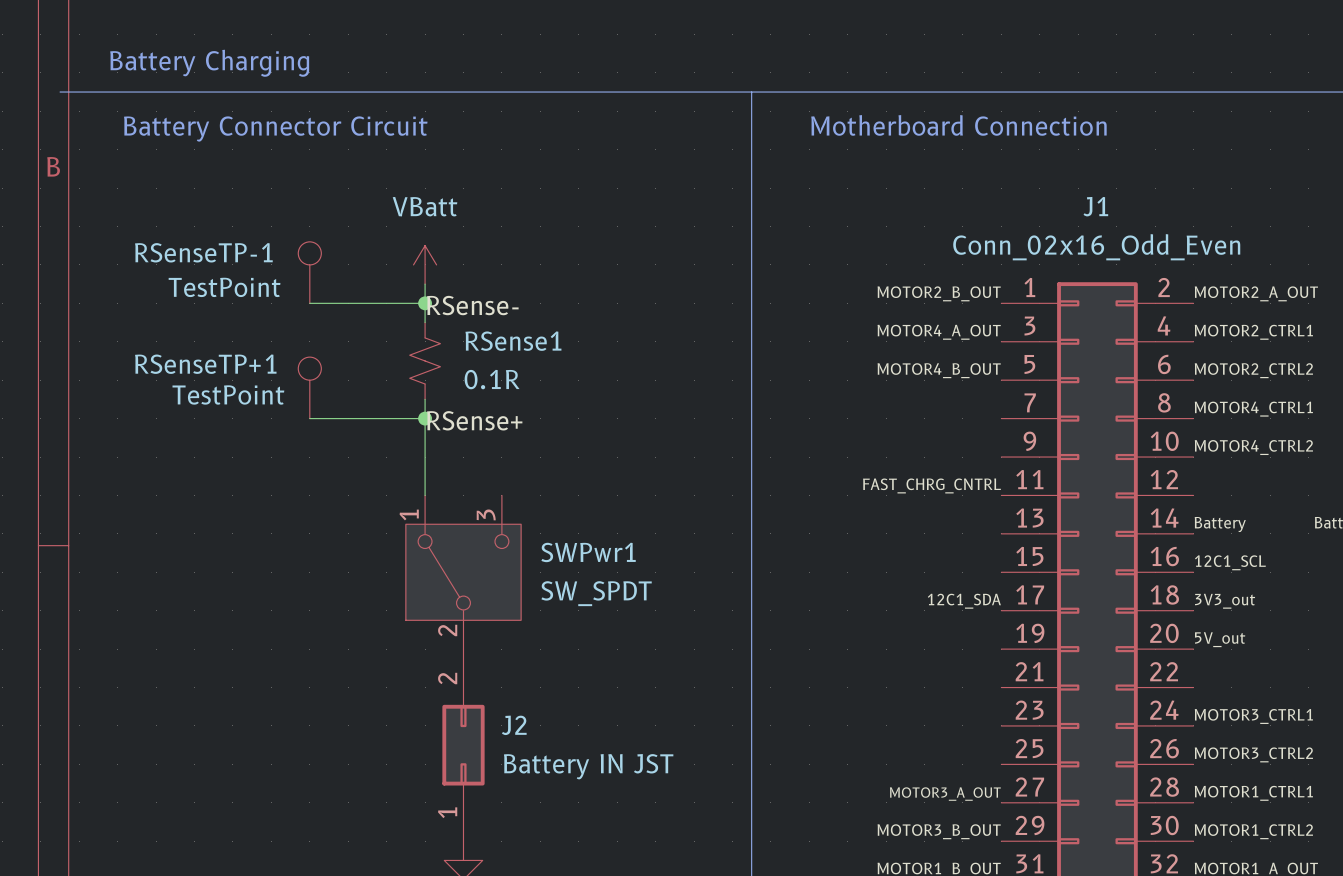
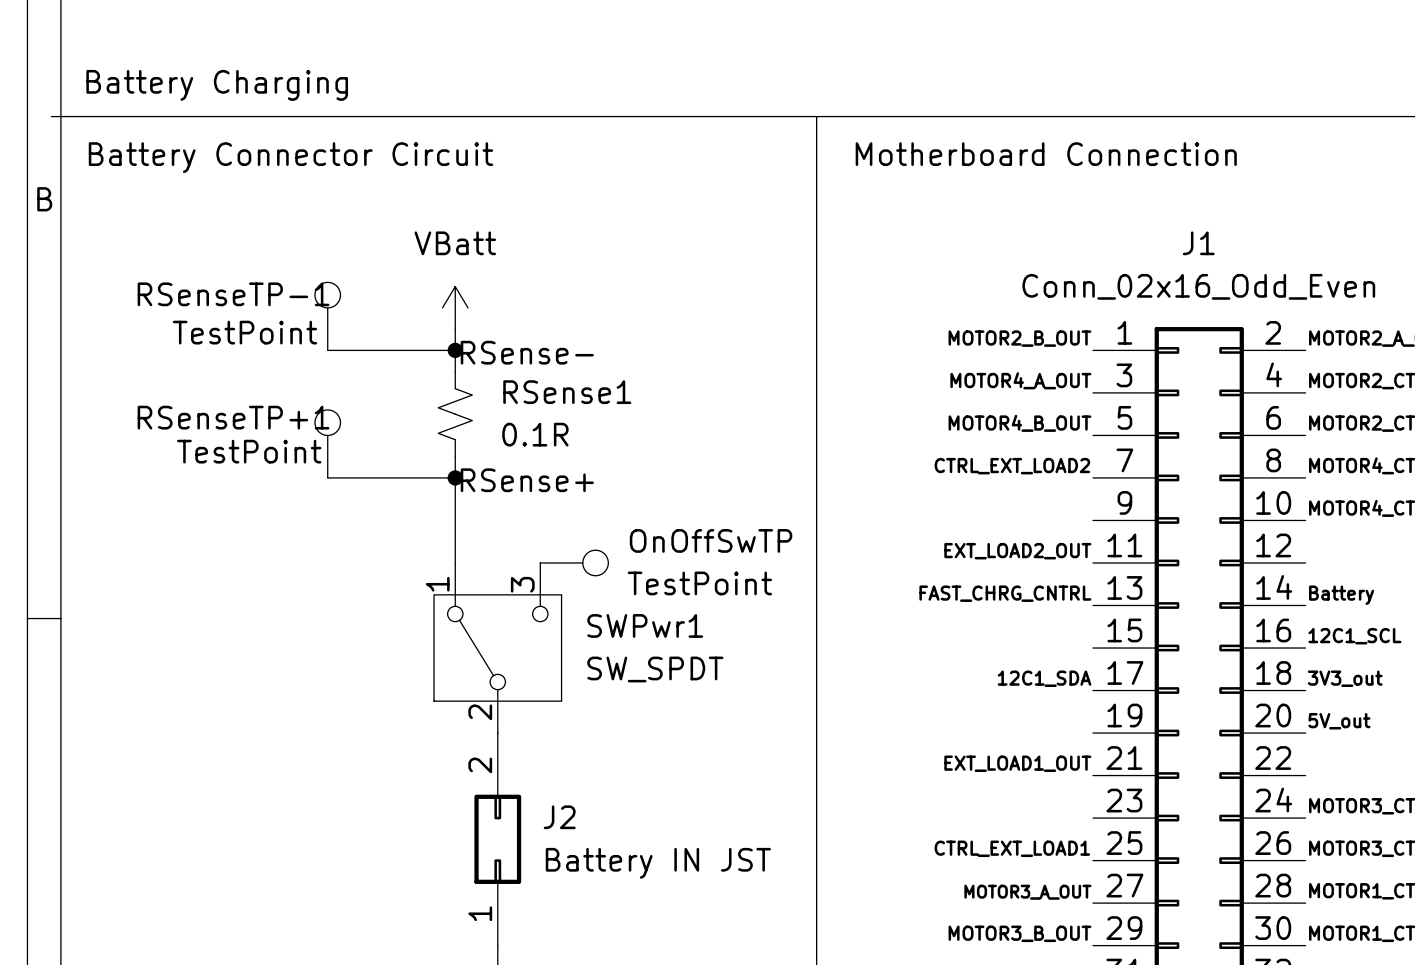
label: none -> CTRL_EXT_LOAD2 (1012, 466)
label: FAST_CHRG_CNTRL (932, 485) -> EXT_LOAD2_OUT (1017, 551)
OnOffSwTP: none -> TestPoint (574, 562)
label: none -> FAST_CHRG_CNTRL (1005, 593)
label: none -> EXT_LOAD1_OUT (1017, 763)
label: none -> CTRL_EXT_LOAD1 (1012, 848)

